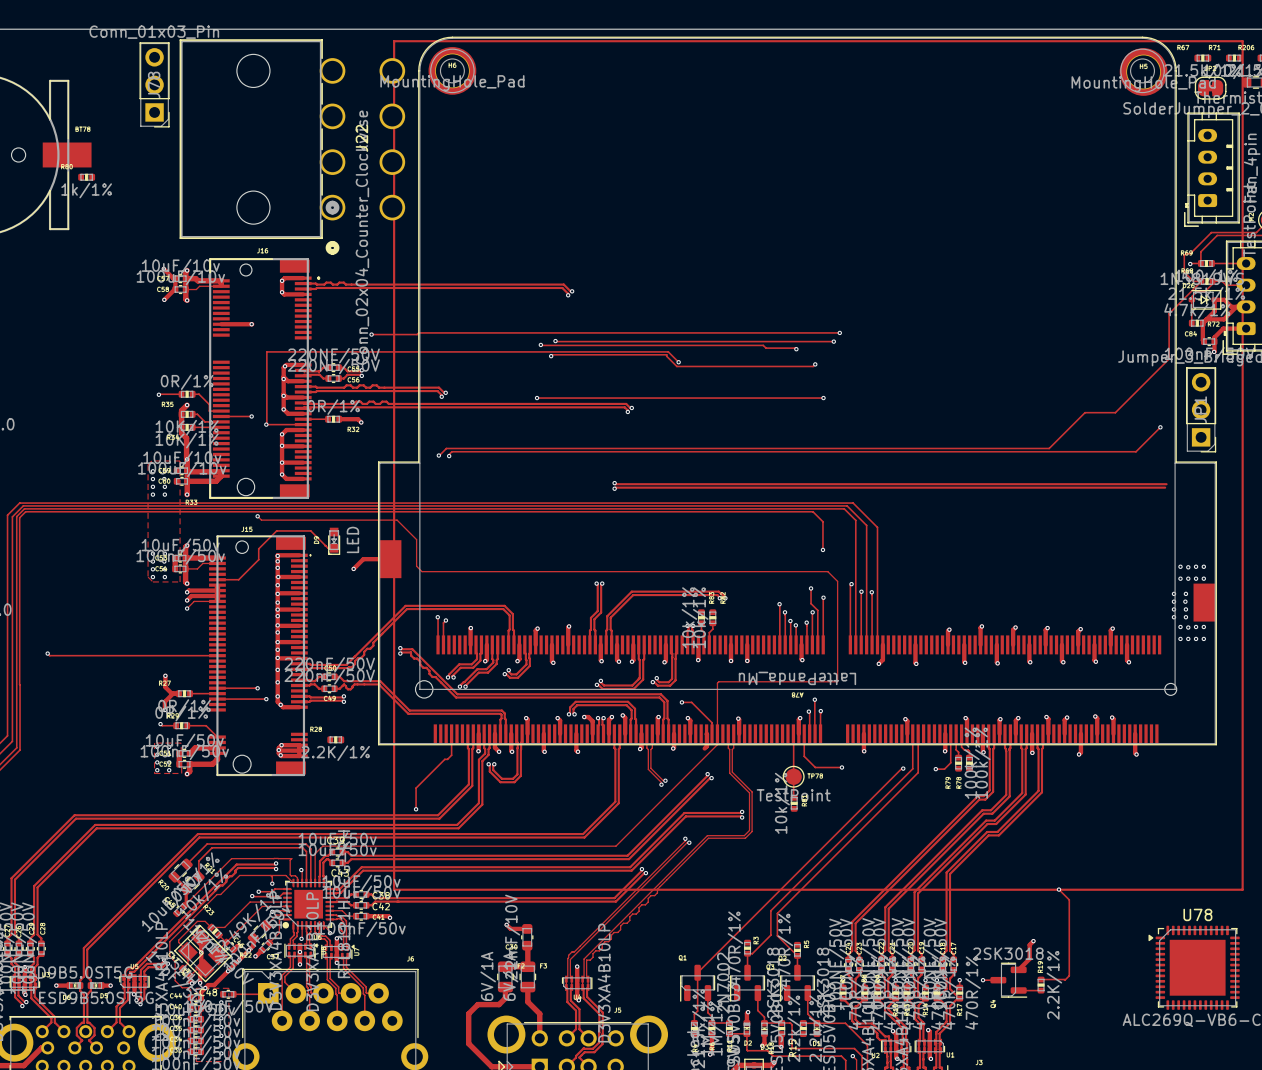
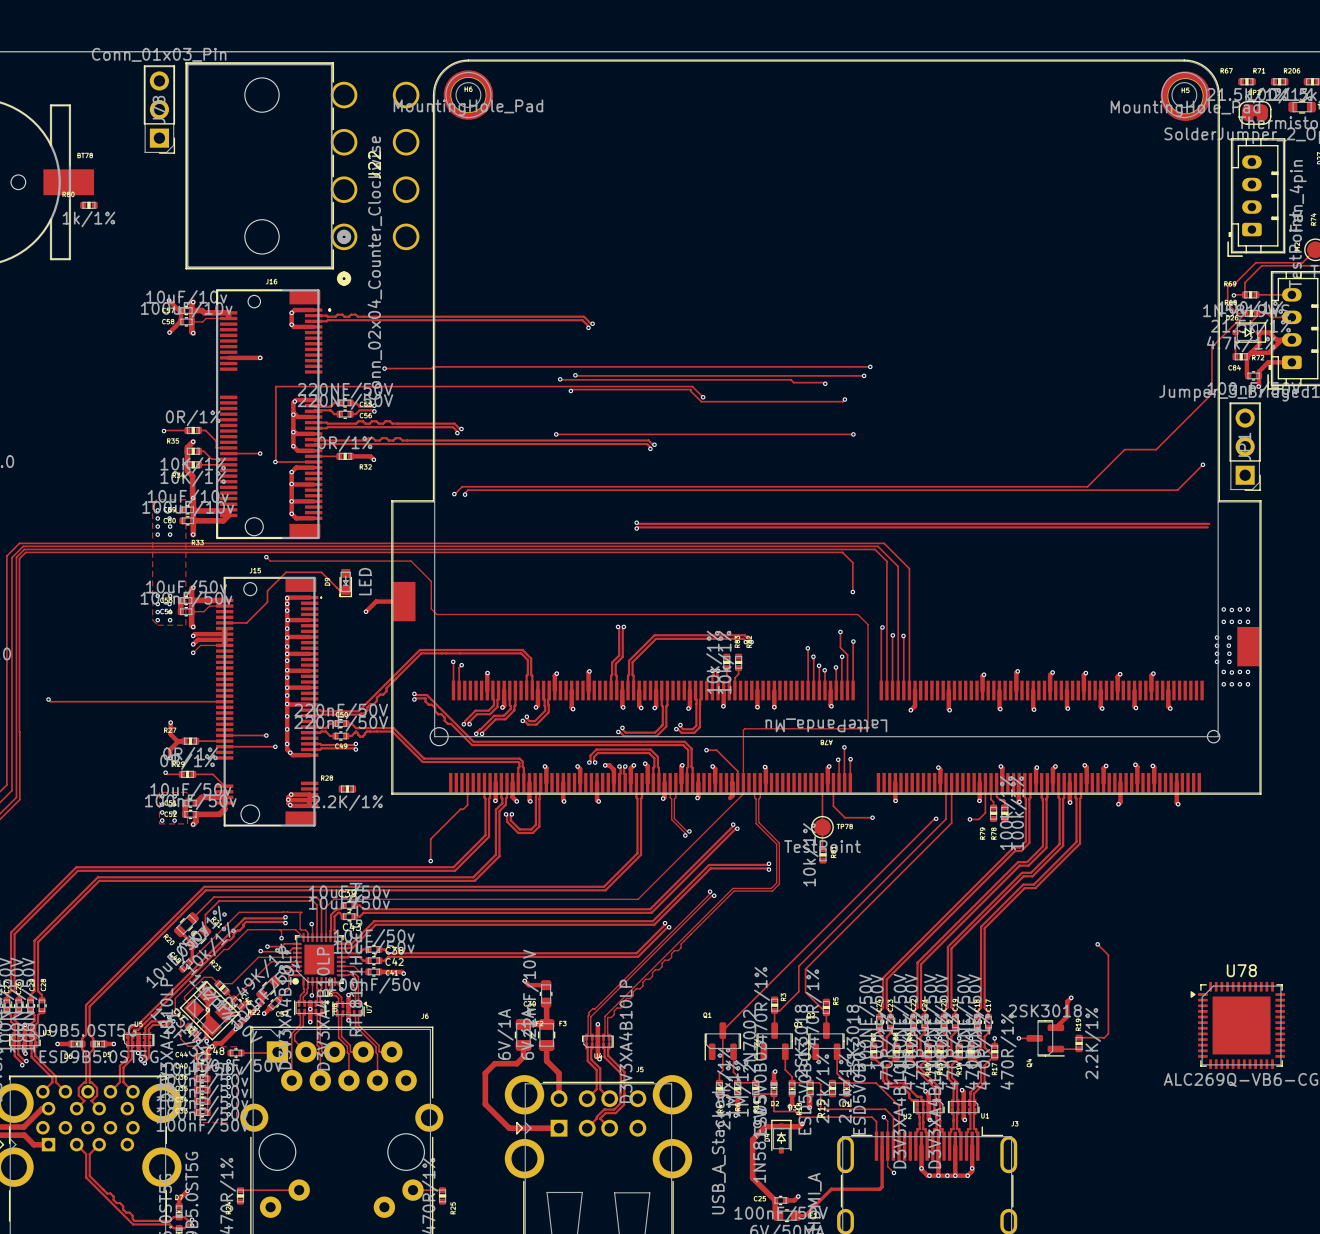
track: (394, 41) (1242, 41) (1242, 889) (394, 889) (394, 41) -> none

